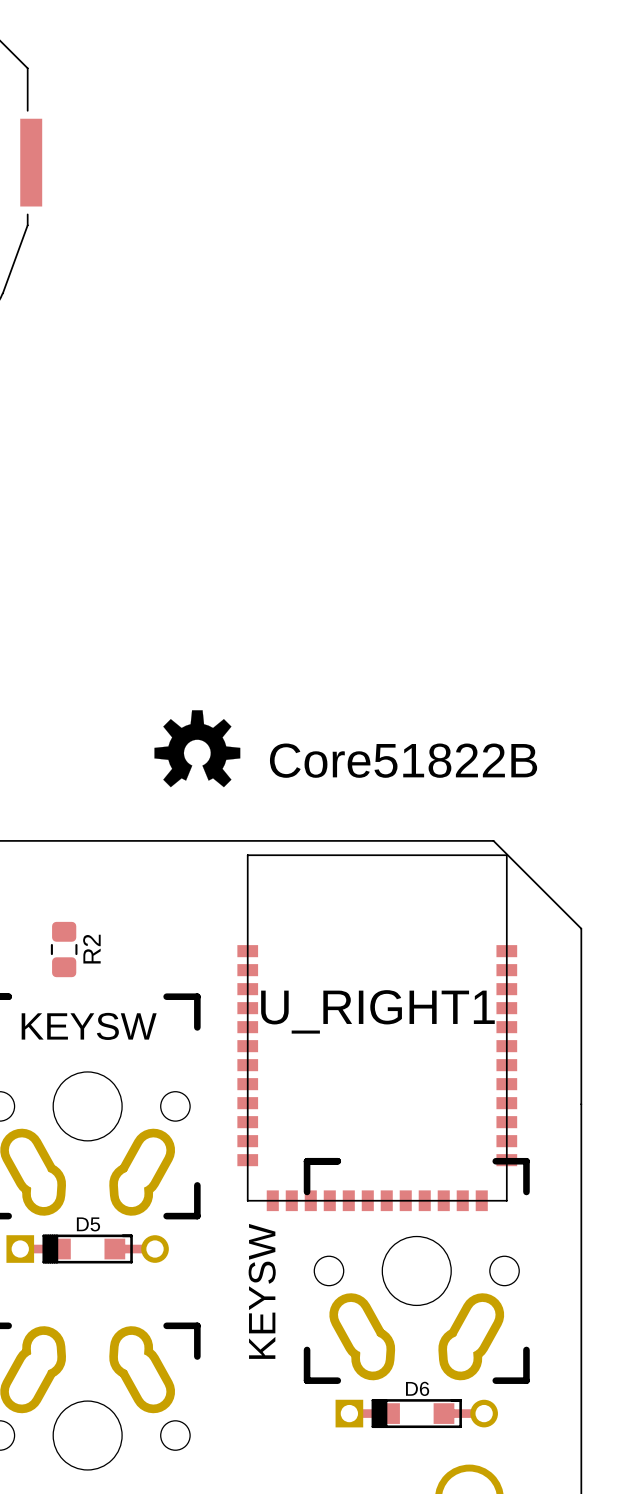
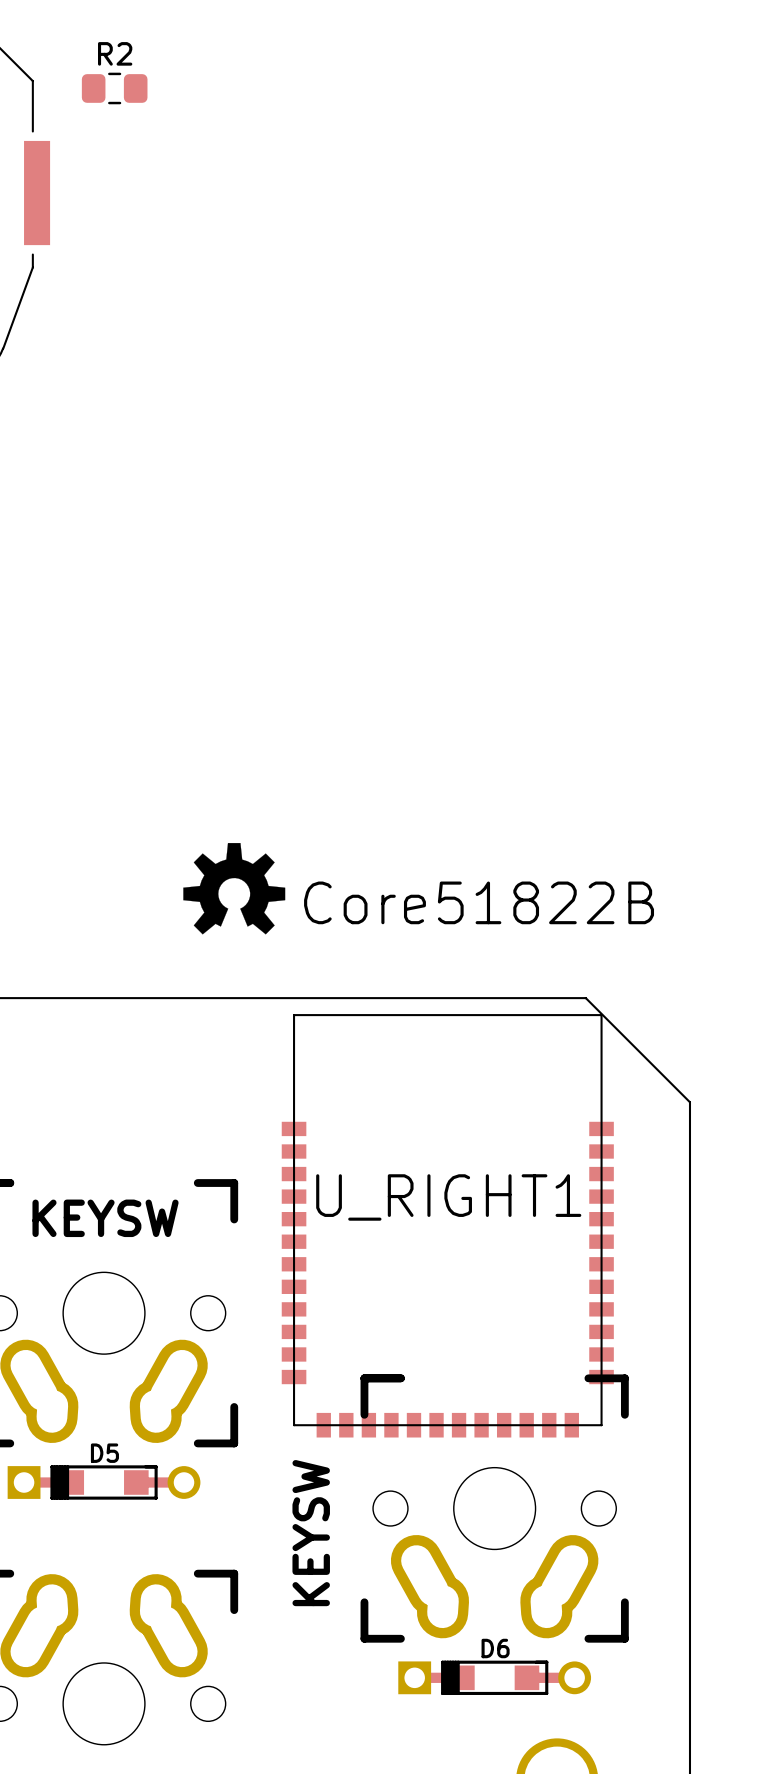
R2 rotation: 0° (64, 949) -> 90° clockwise (114, 88)
R2 position: (64, 949) -> (114, 88)
R2 name position: R2 (91, 949) -> R2 (115, 53)

